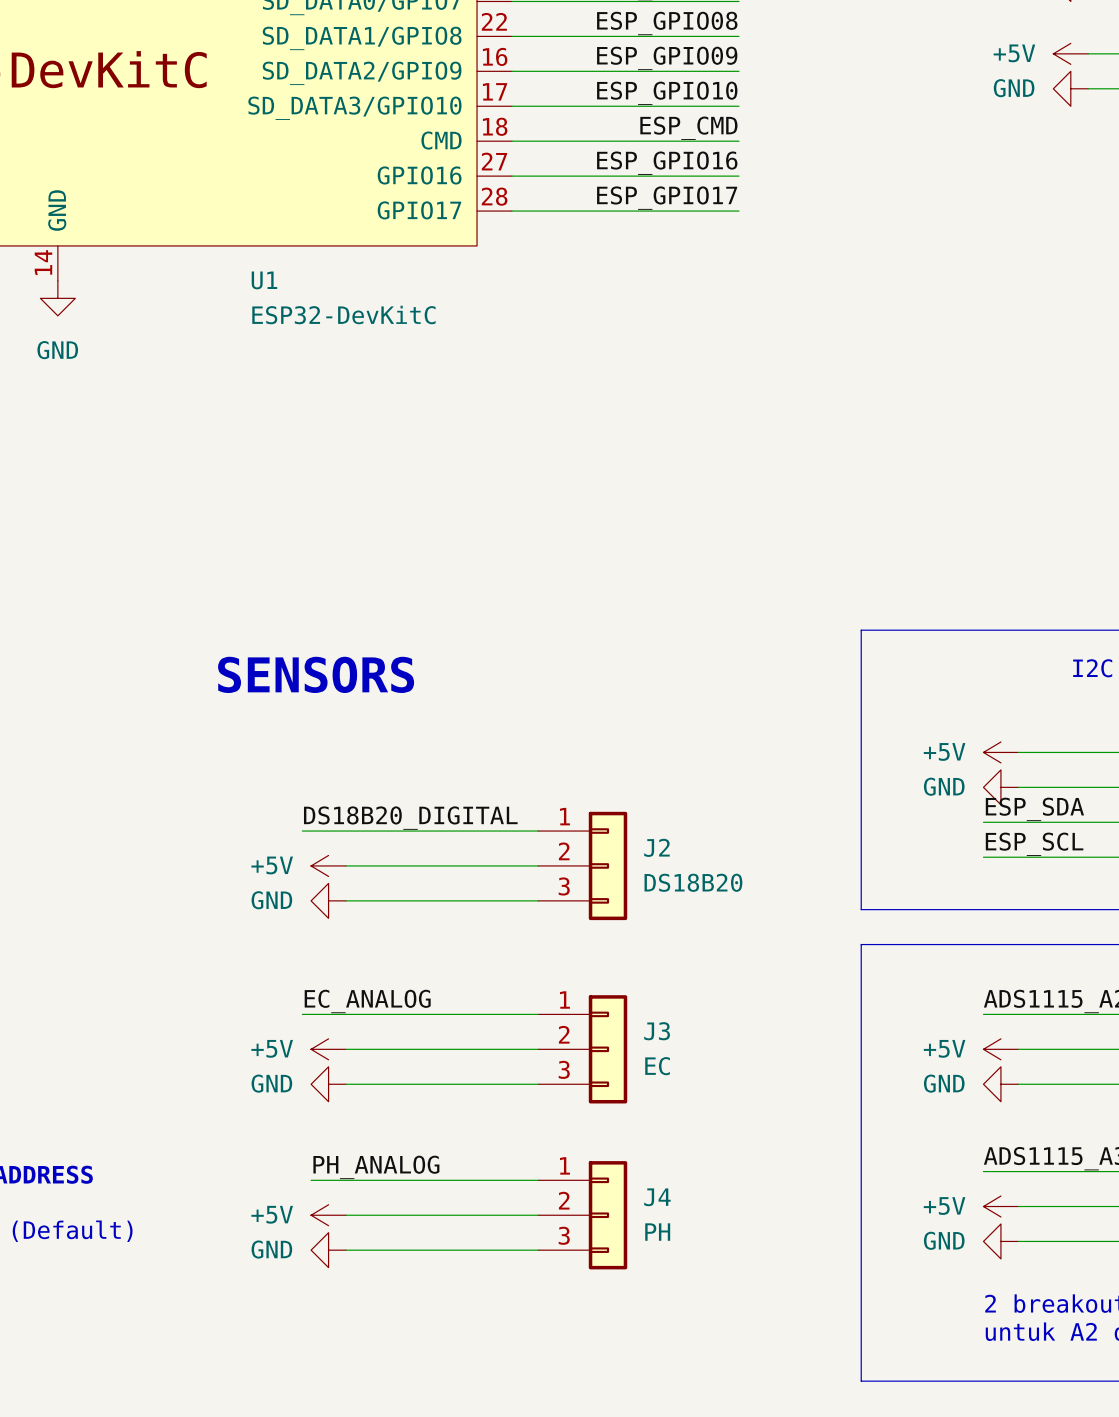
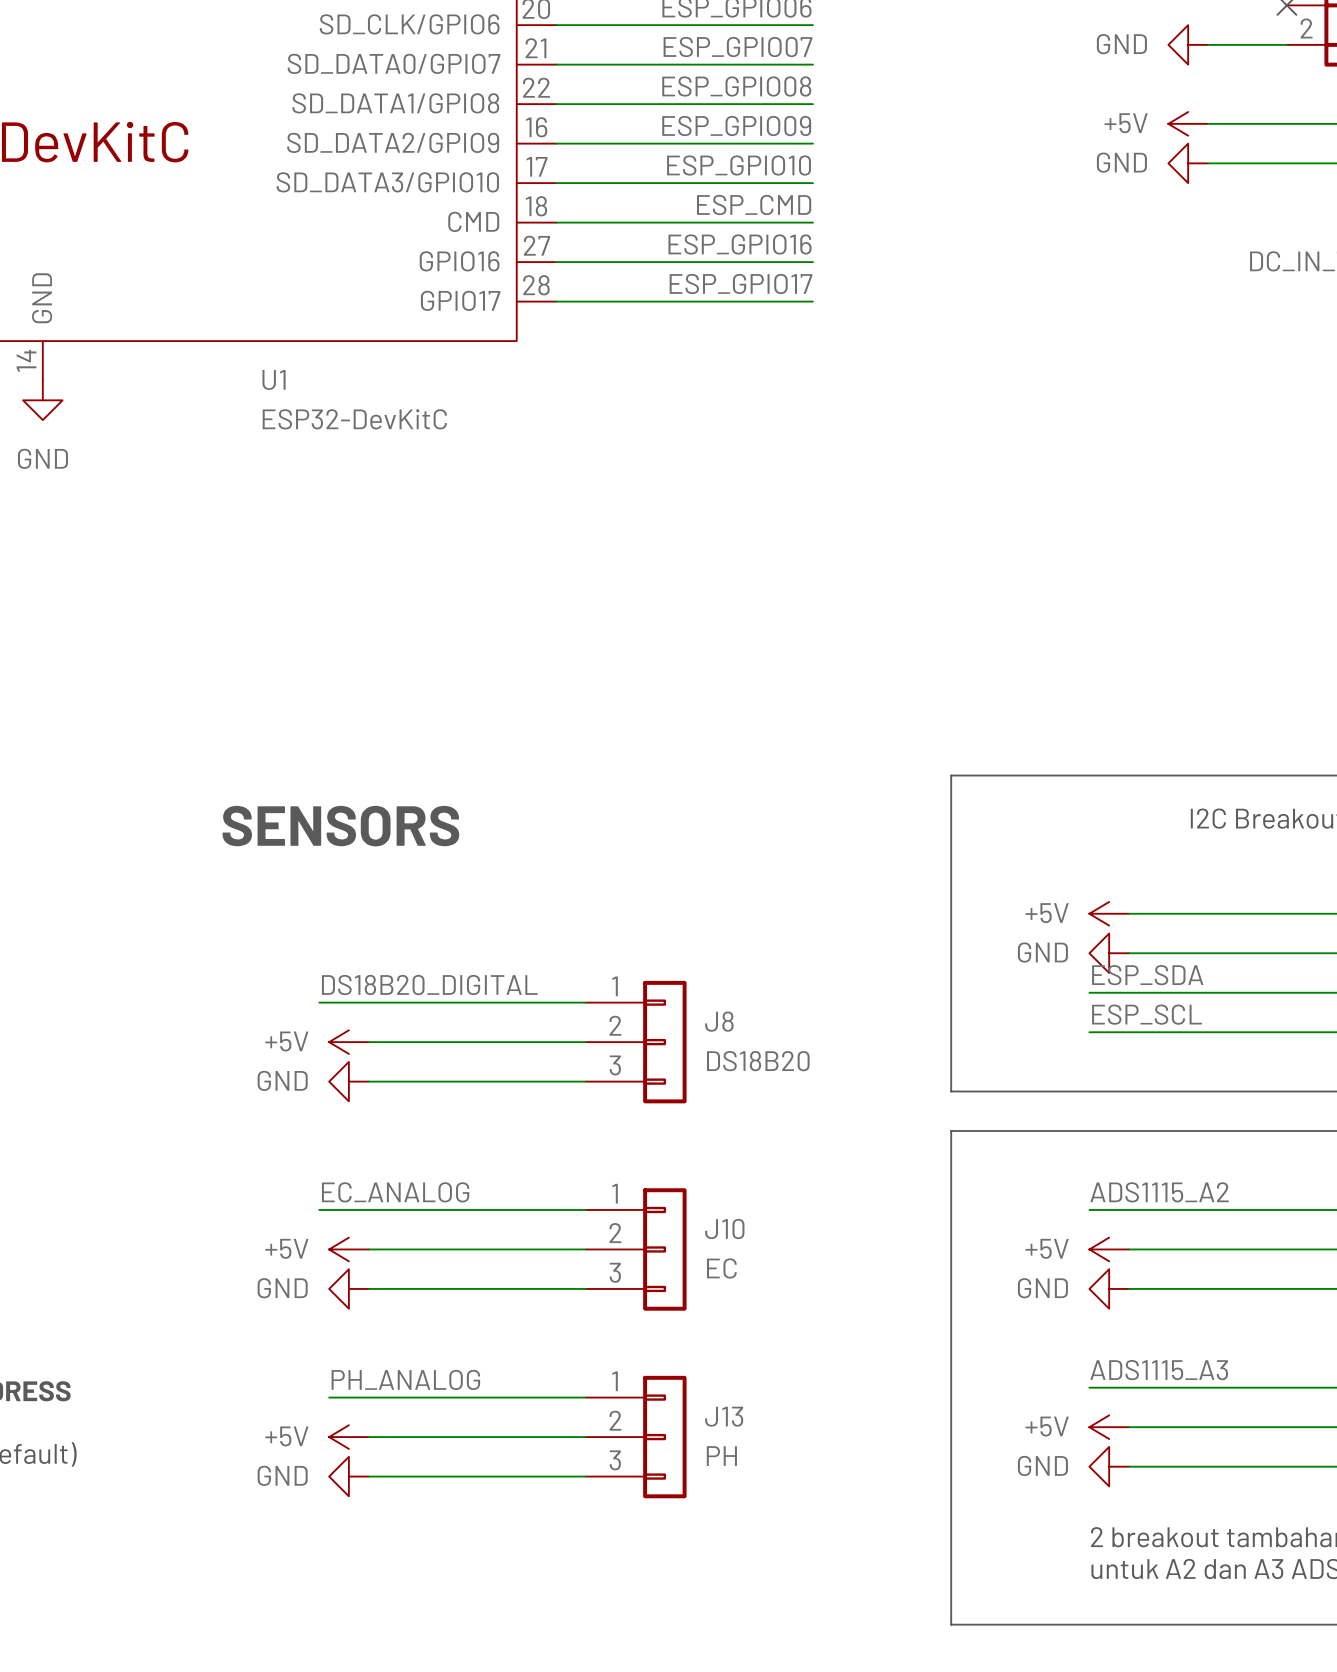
J2 name: J2 (656, 847) -> J8 (719, 1021)
J3 name: J3 (657, 1031) -> J10 (724, 1229)
J4 name: J4 (657, 1197) -> J13 (724, 1416)

